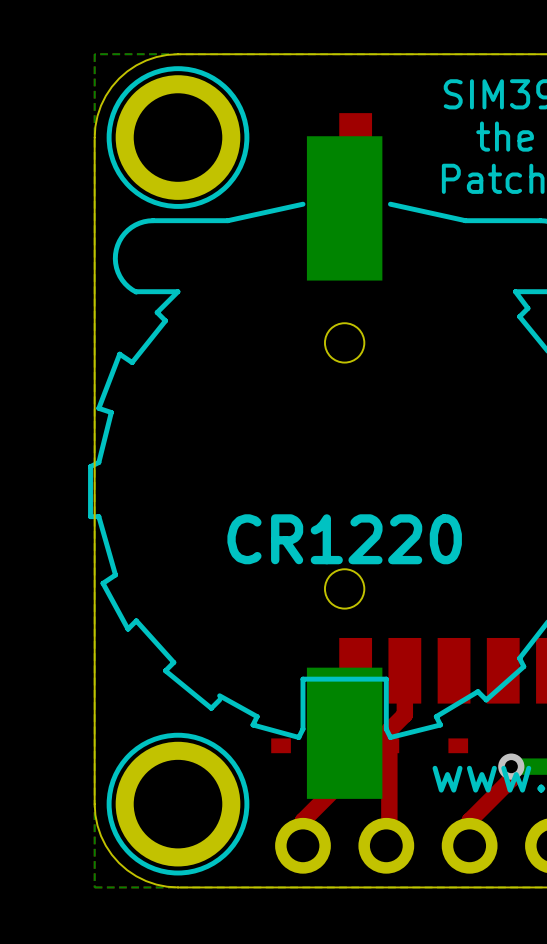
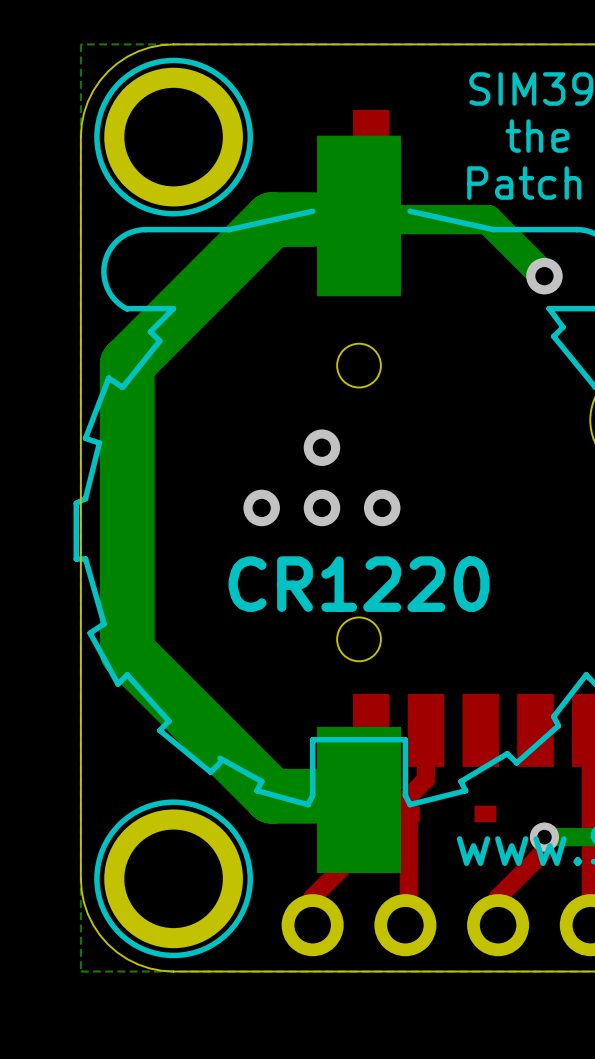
bottom track: none -> (544, 276) (487, 219) (271, 219) (127, 364) (127, 651) (271, 796) (312, 796)
via: none -> (544, 276)
via: none -> (321, 447)
via: none -> (261, 507)
via: none -> (321, 507)
via: none -> (382, 507)

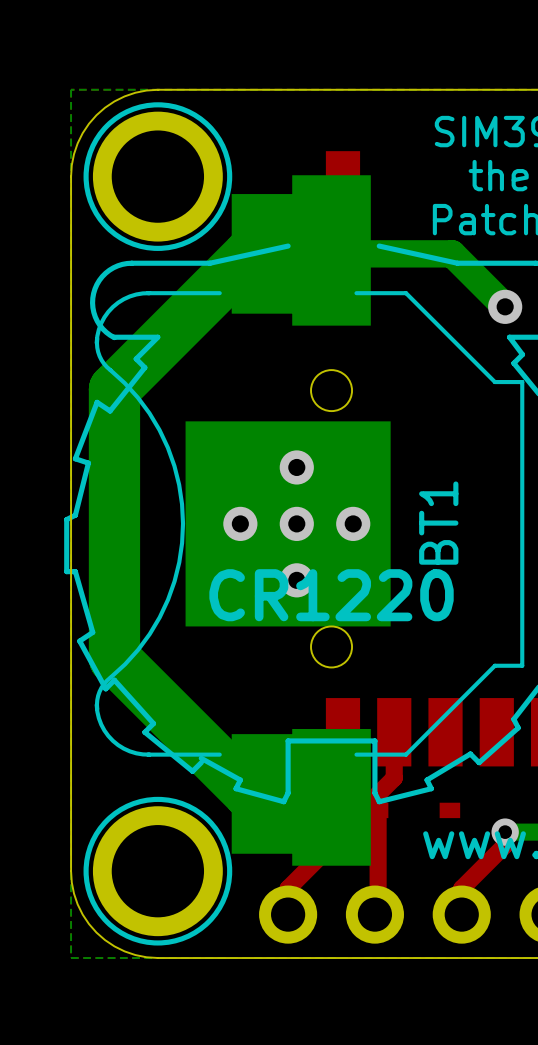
BT1: none -> (309, 523)
via: none -> (296, 580)

